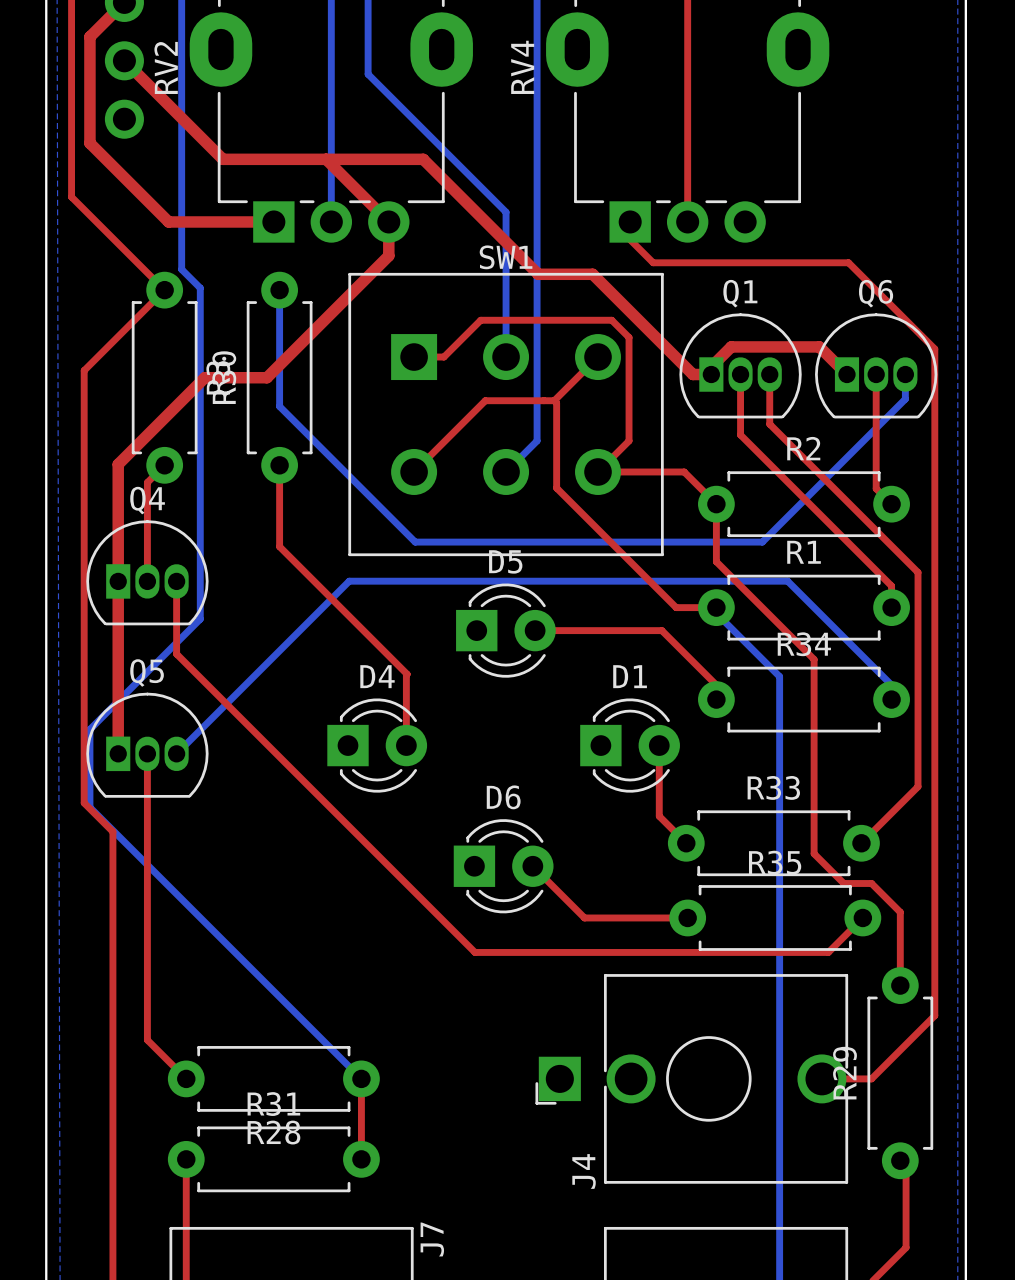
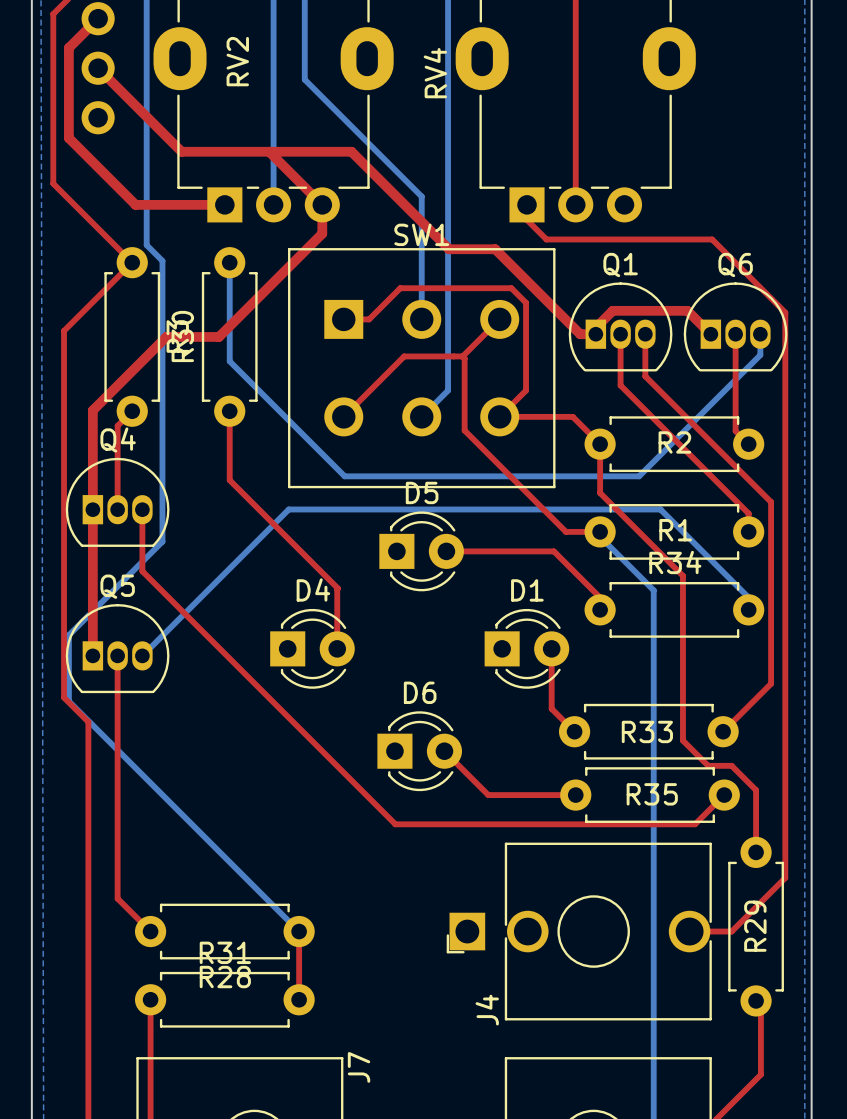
RV2 name position: RV2 (166, 67) -> RV2 (237, 61)
R2 name position: R2 (803, 448) -> R2 (674, 442)
R1 name position: R1 (804, 552) -> R1 (675, 530)
R33 name position: R33 (773, 787) -> R33 (647, 731)
R35 name position: R35 (775, 862) -> R35 (652, 794)
R29 name position: R29 (844, 1073) -> R29 (755, 926)

